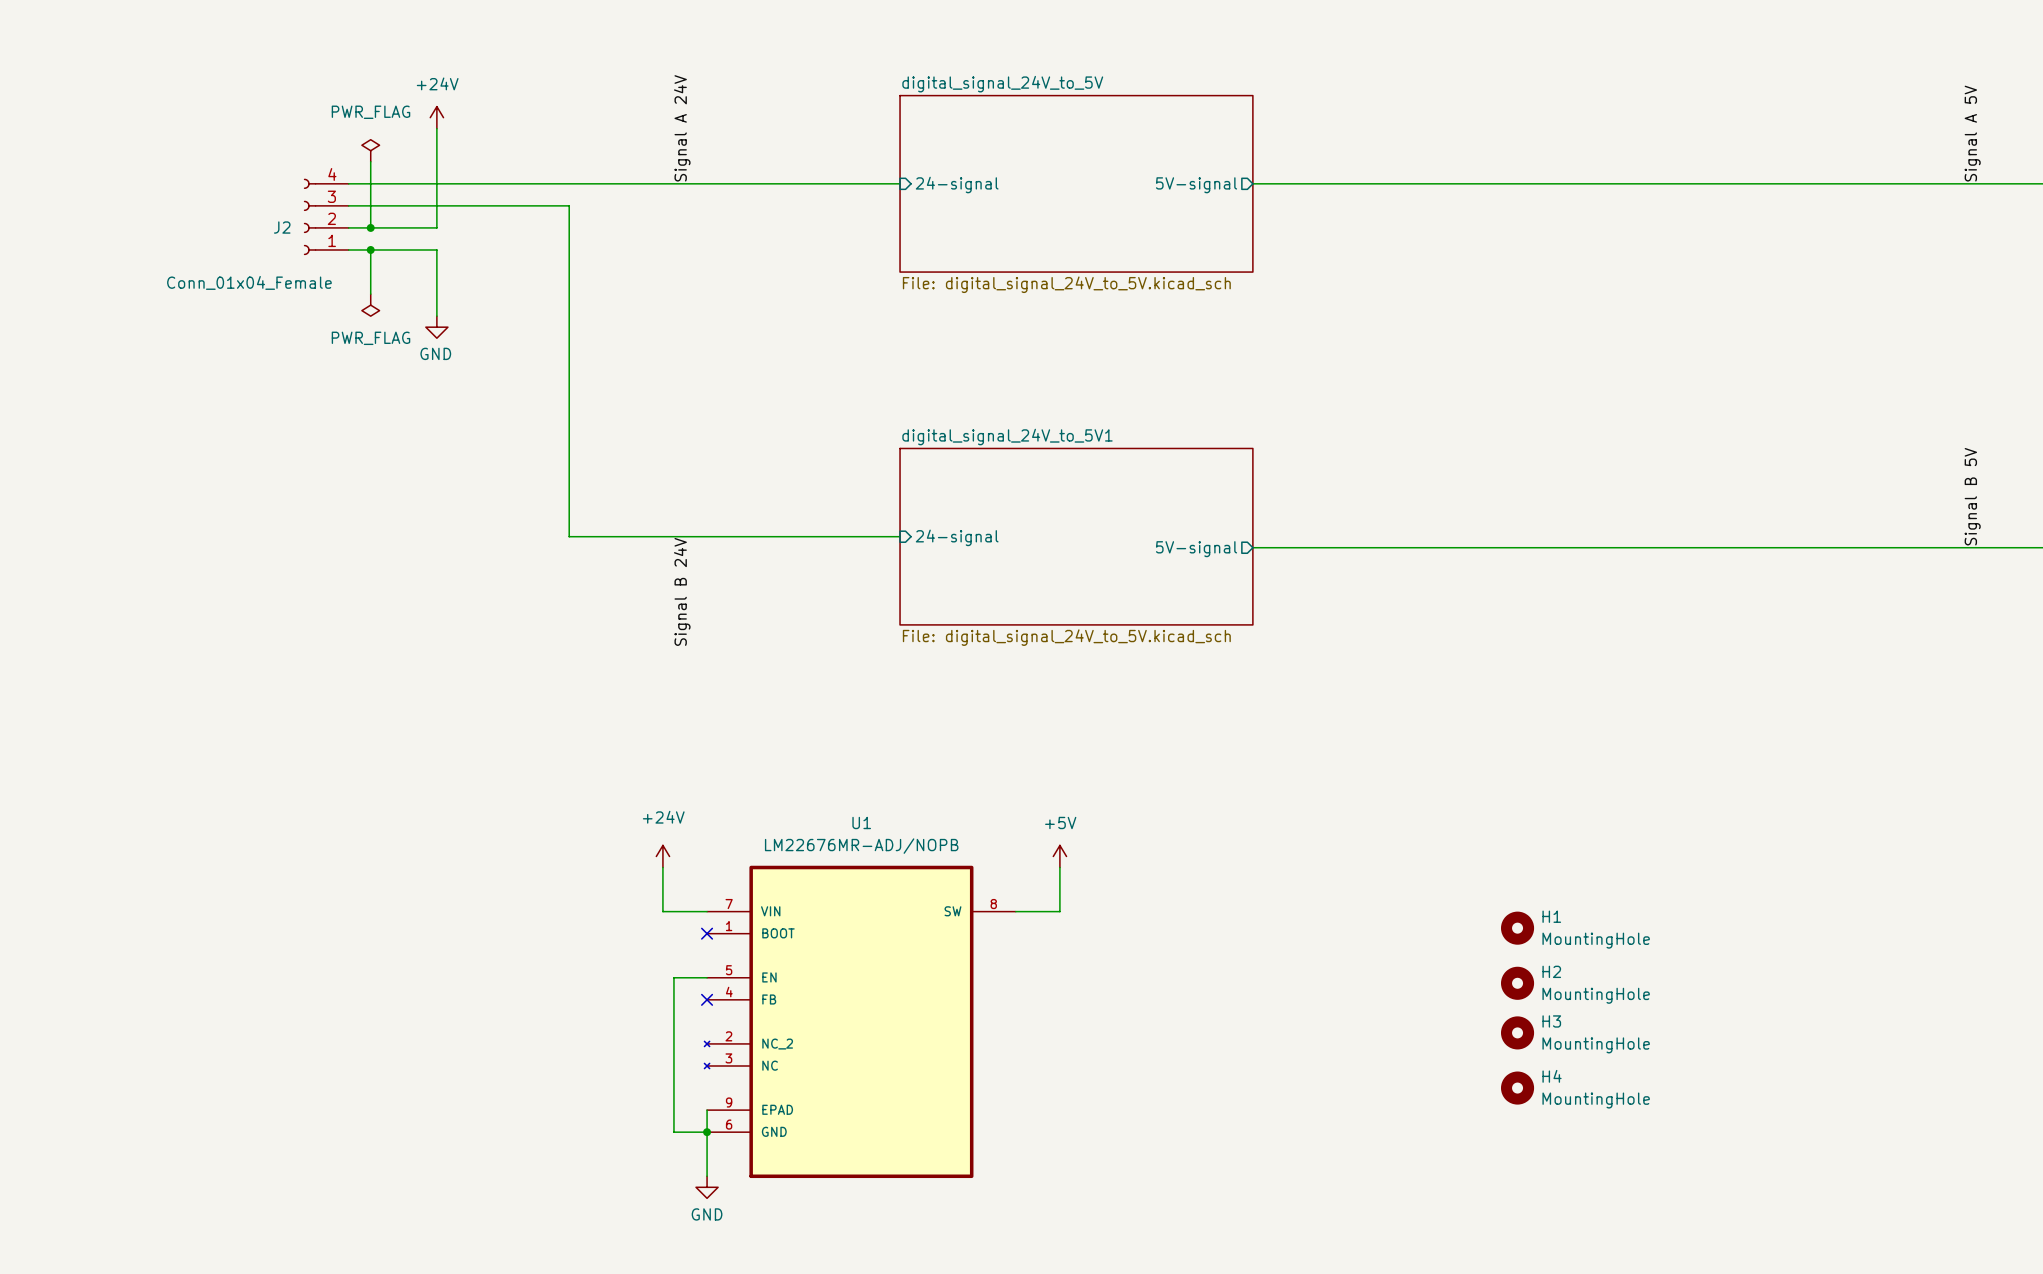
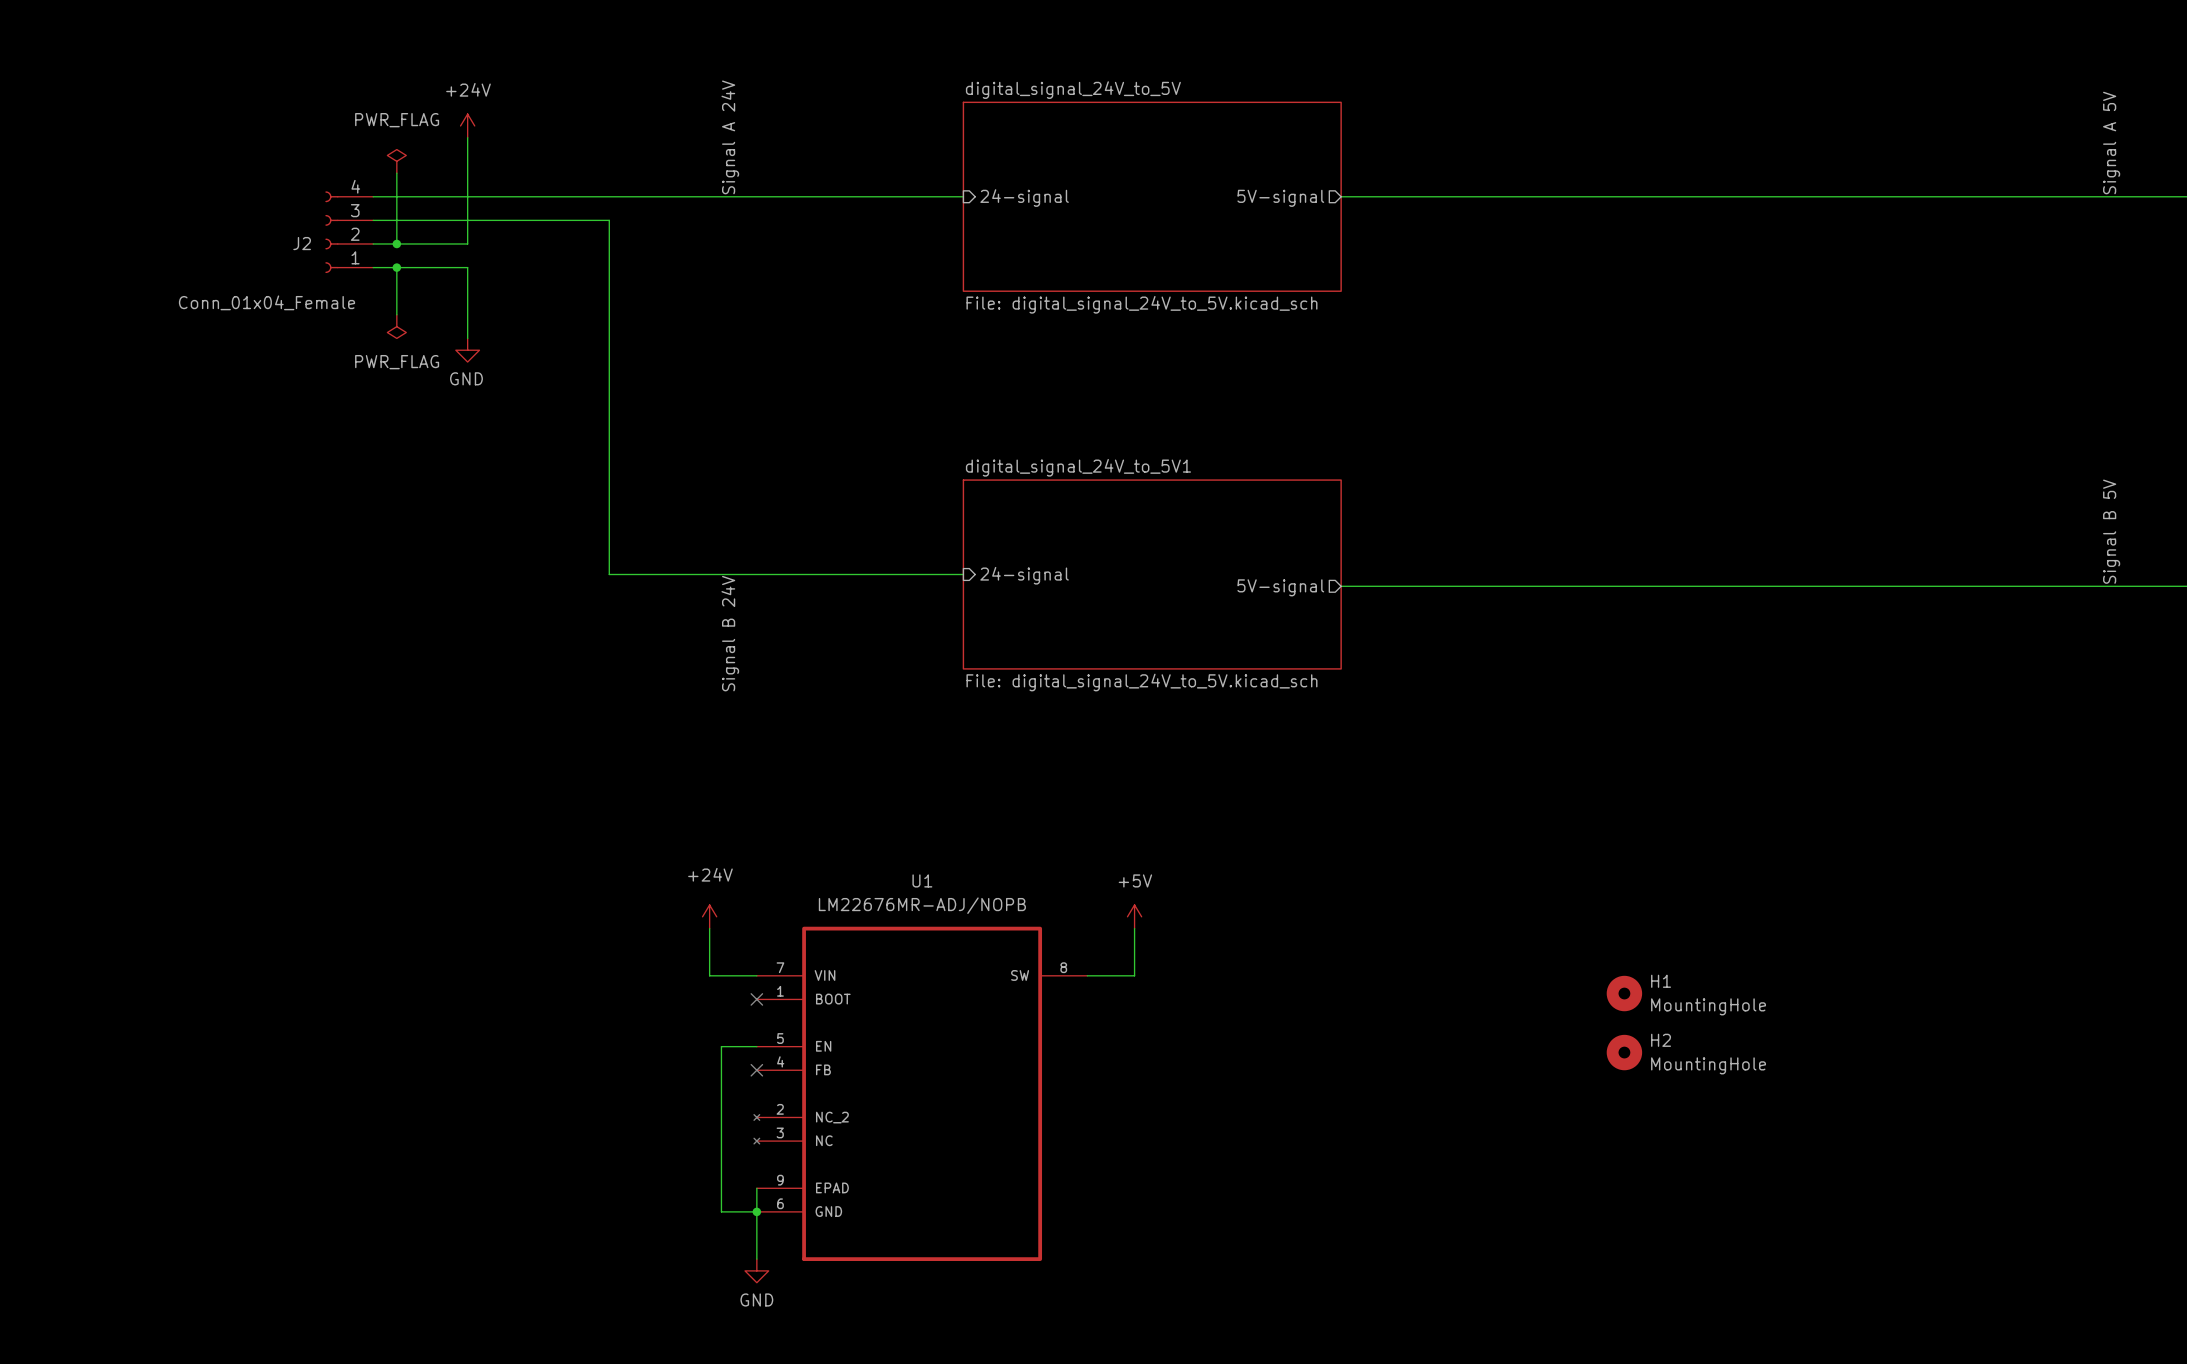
H3: MountingHole (1517, 1032) -> none
H4: MountingHole (1517, 1088) -> none

